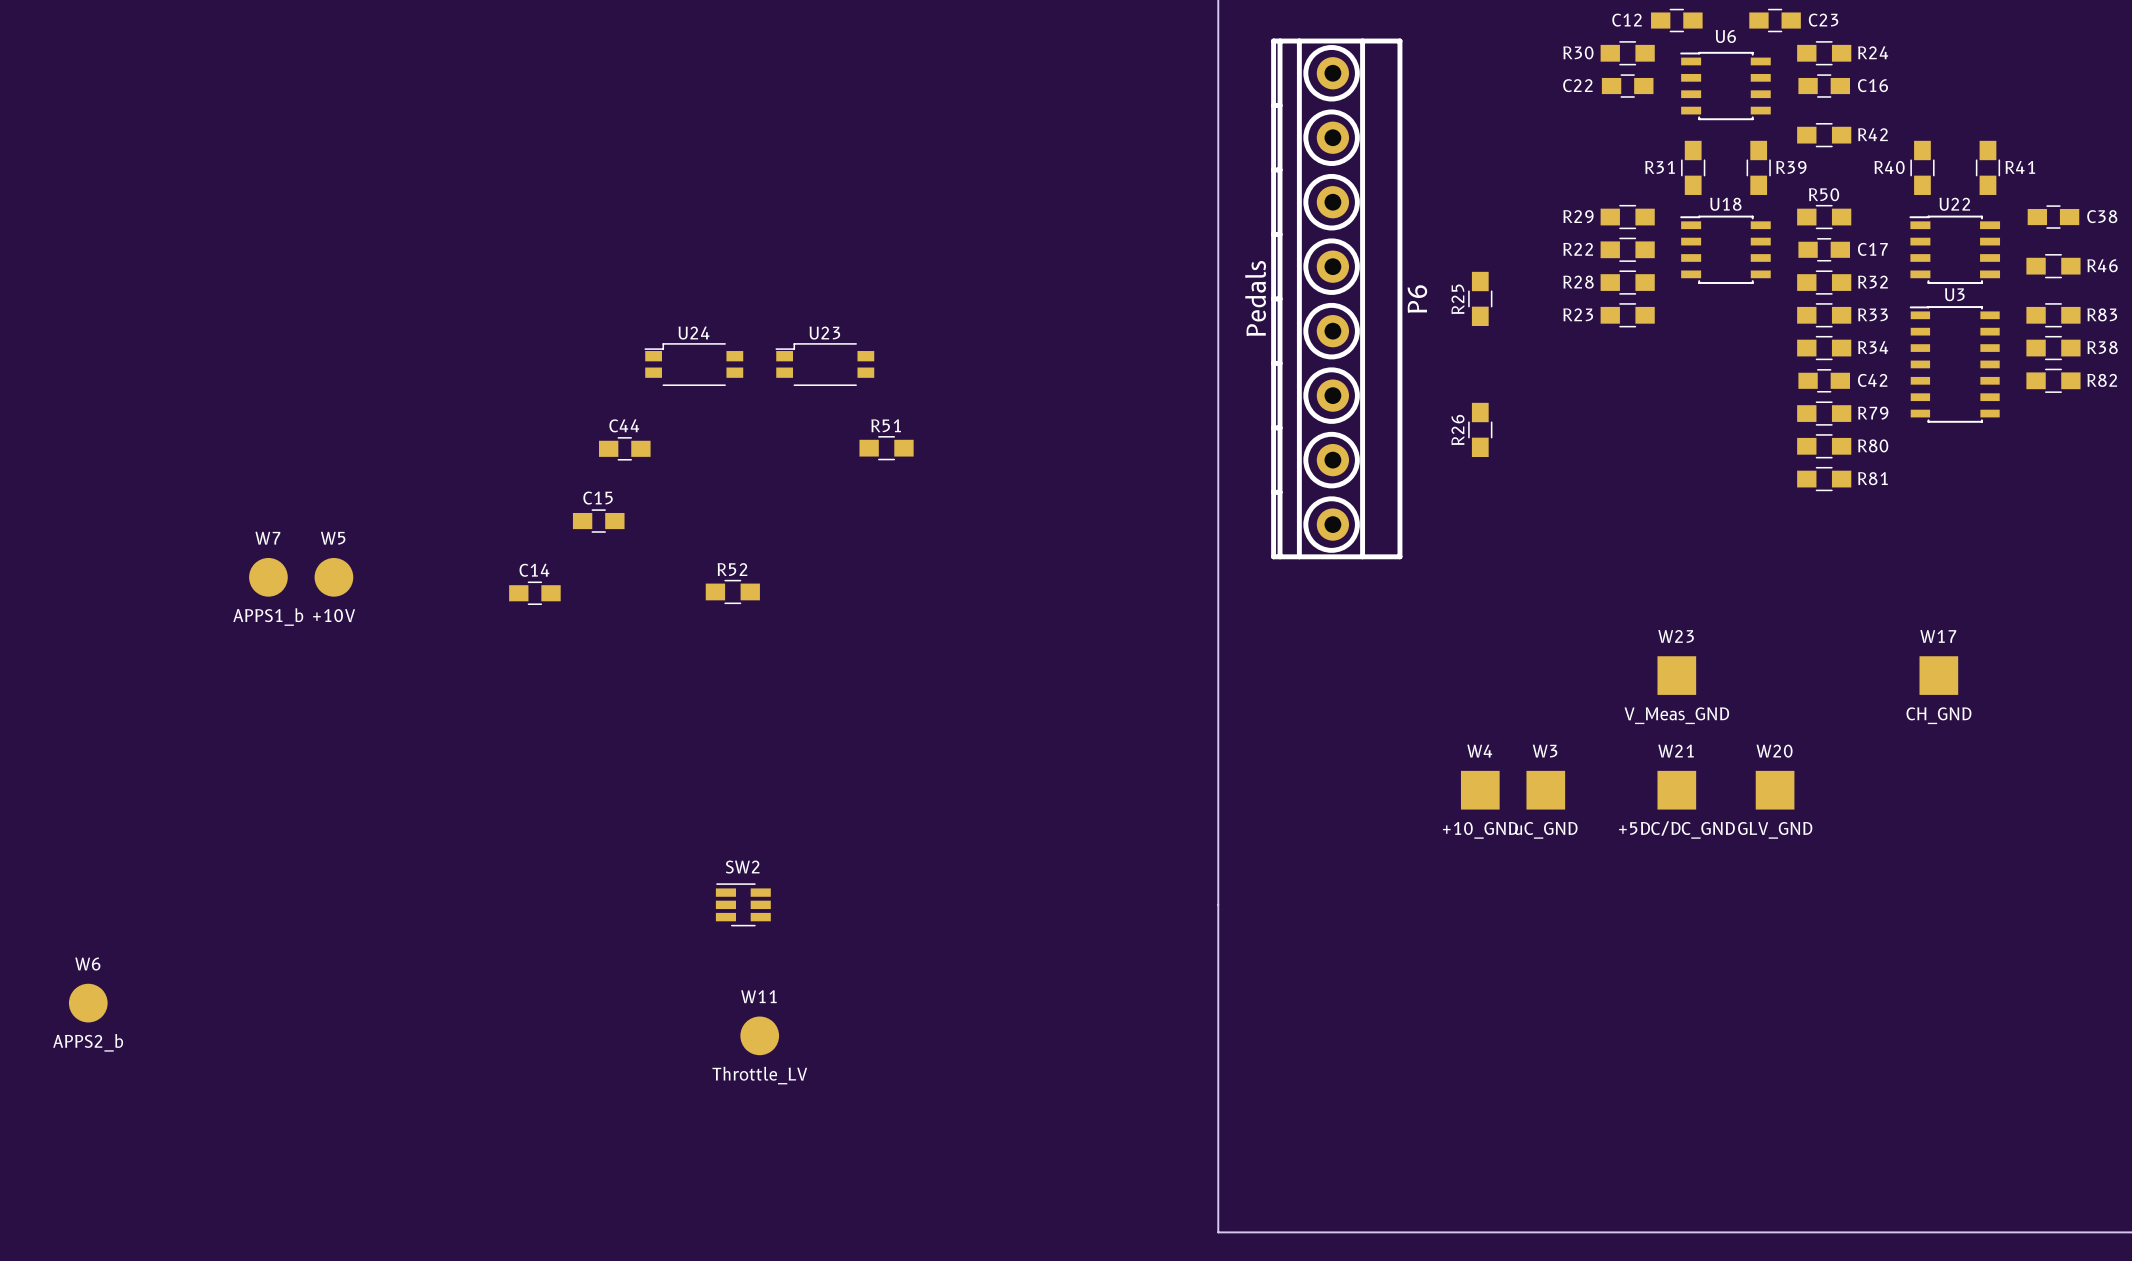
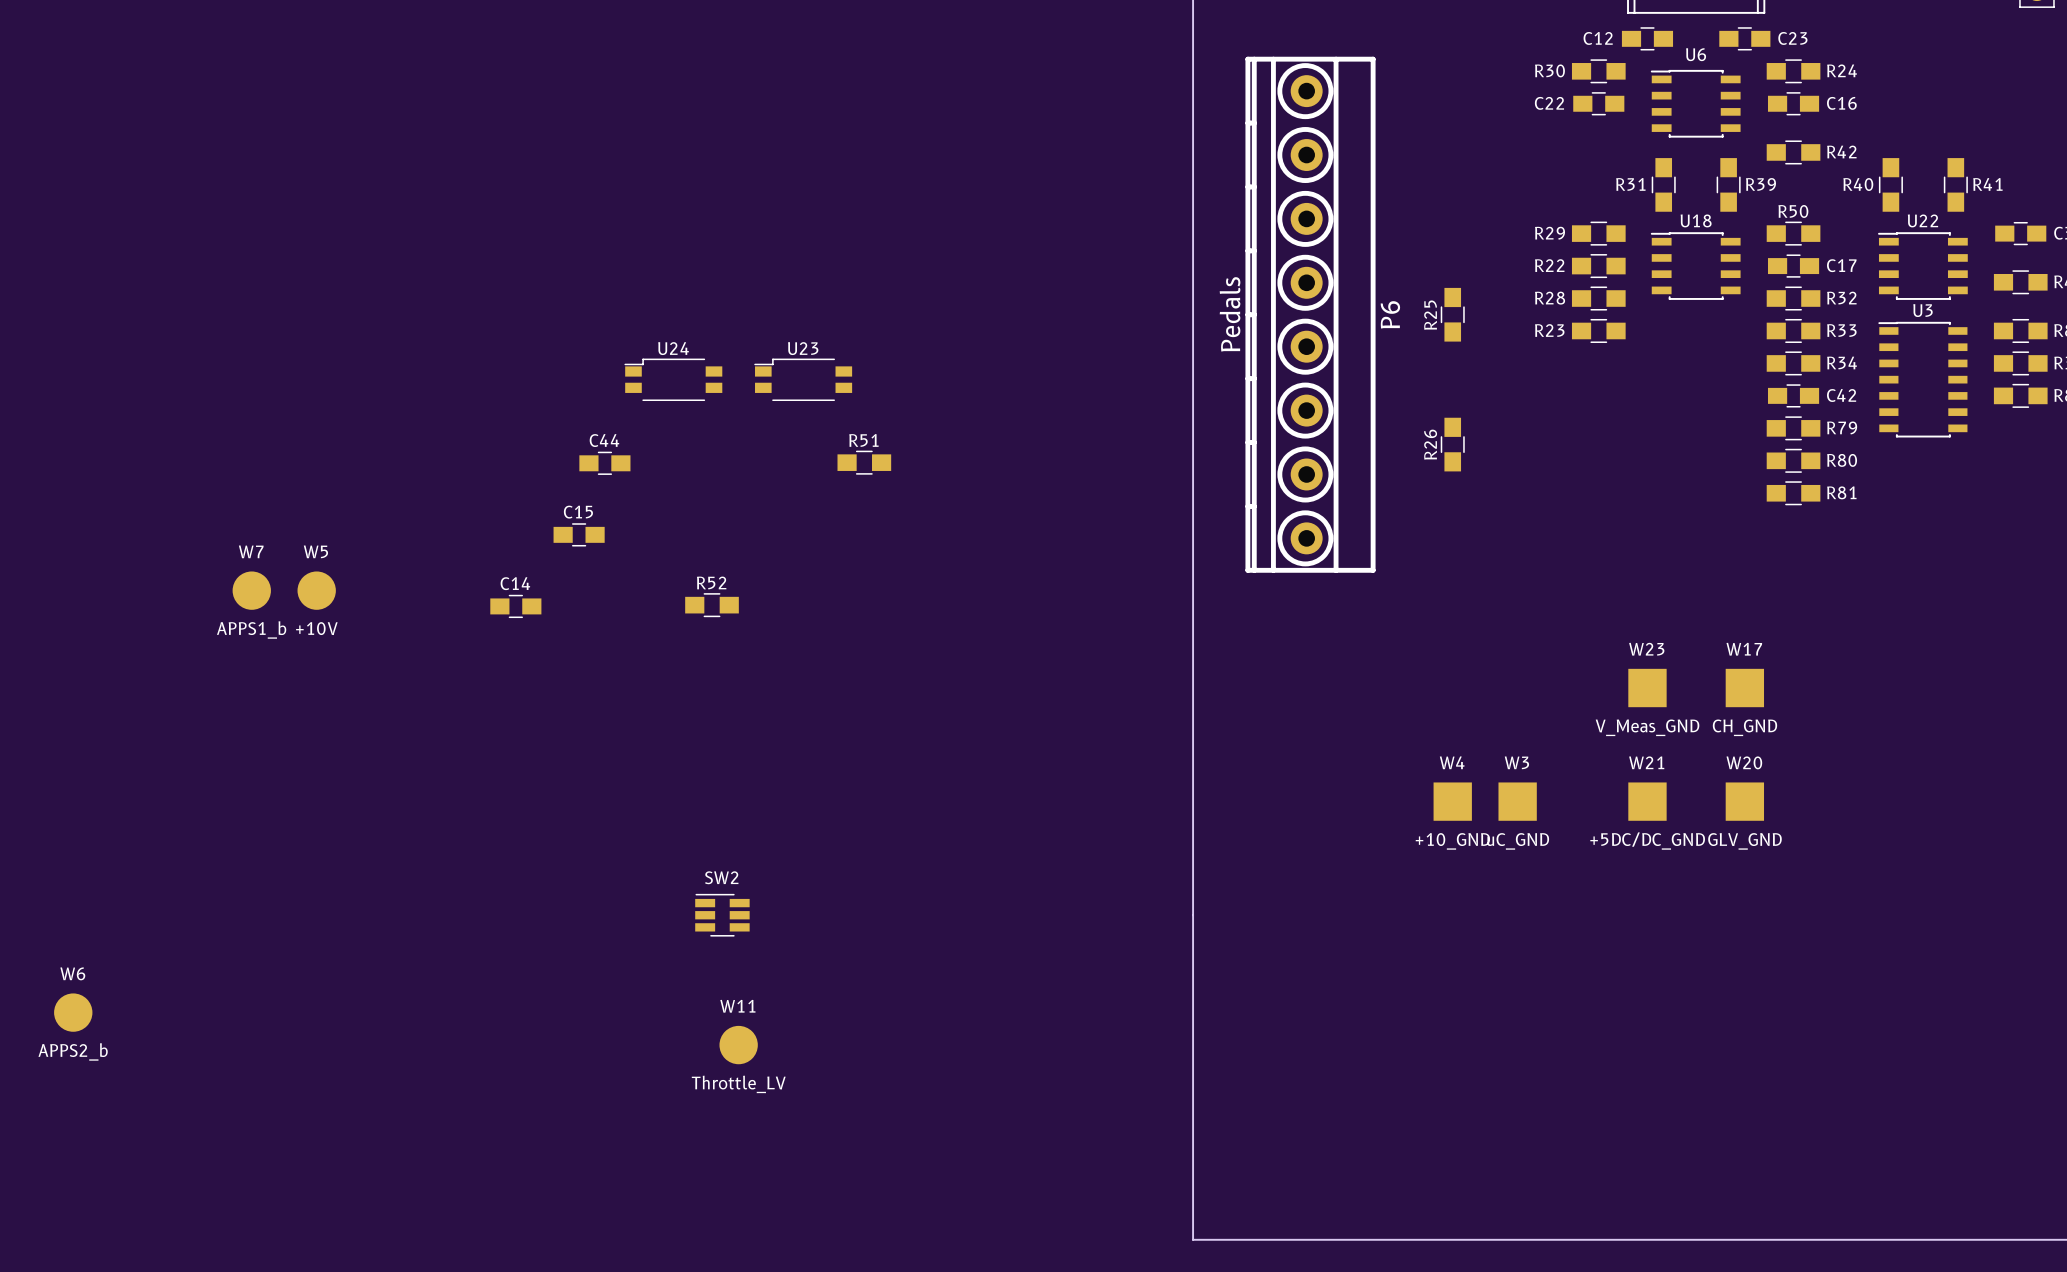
W17 position: (1938, 675) -> (1744, 688)

